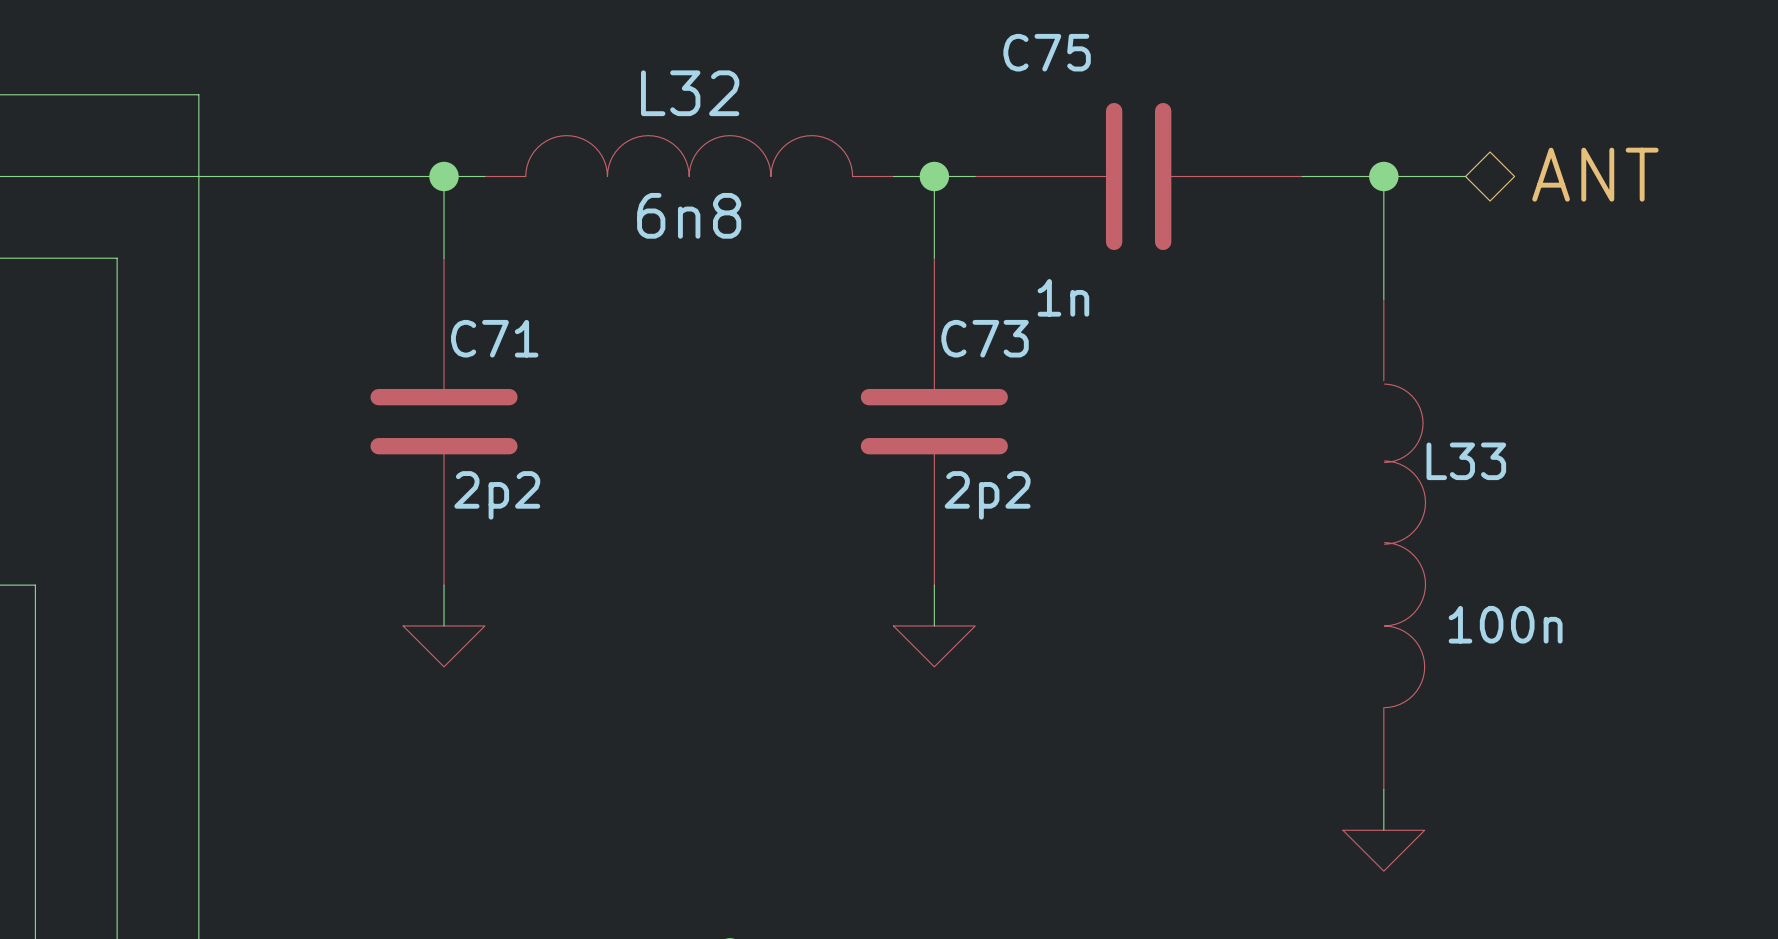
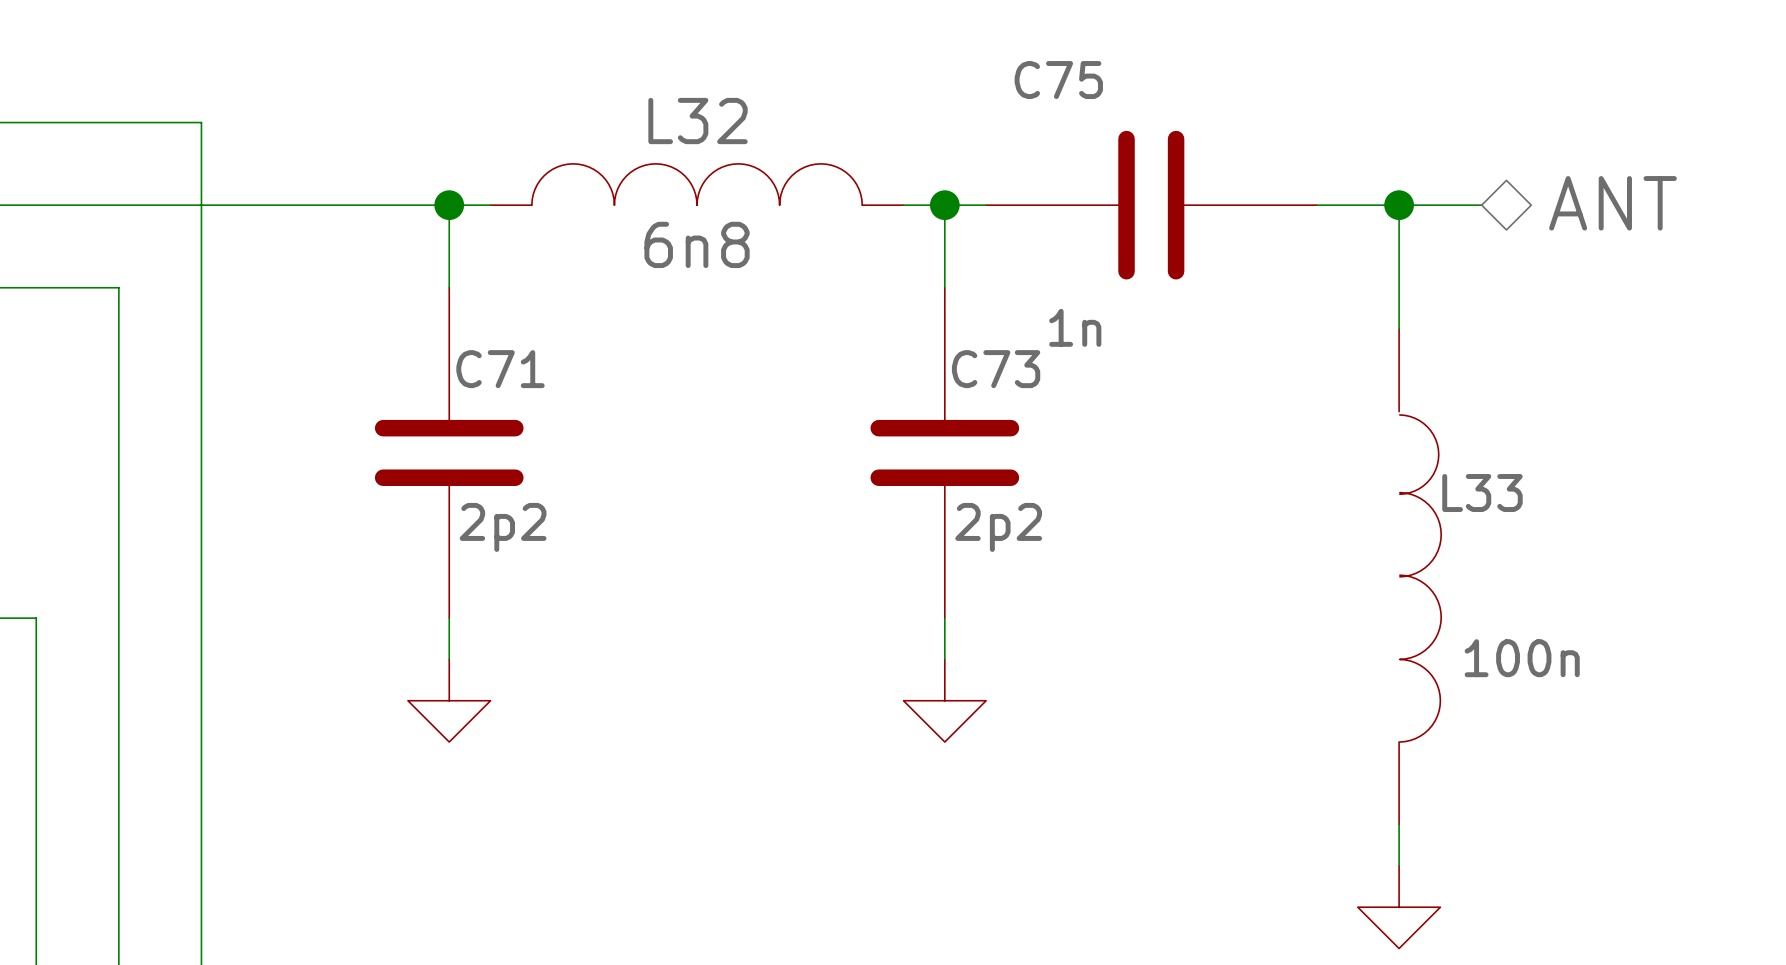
power symbol shape: [403, 625, 485, 667] -> [407, 659, 491, 743]
power symbol shape: [893, 625, 976, 667] -> [903, 659, 987, 743]
power symbol shape: [1342, 830, 1425, 872] -> [1357, 865, 1441, 949]

